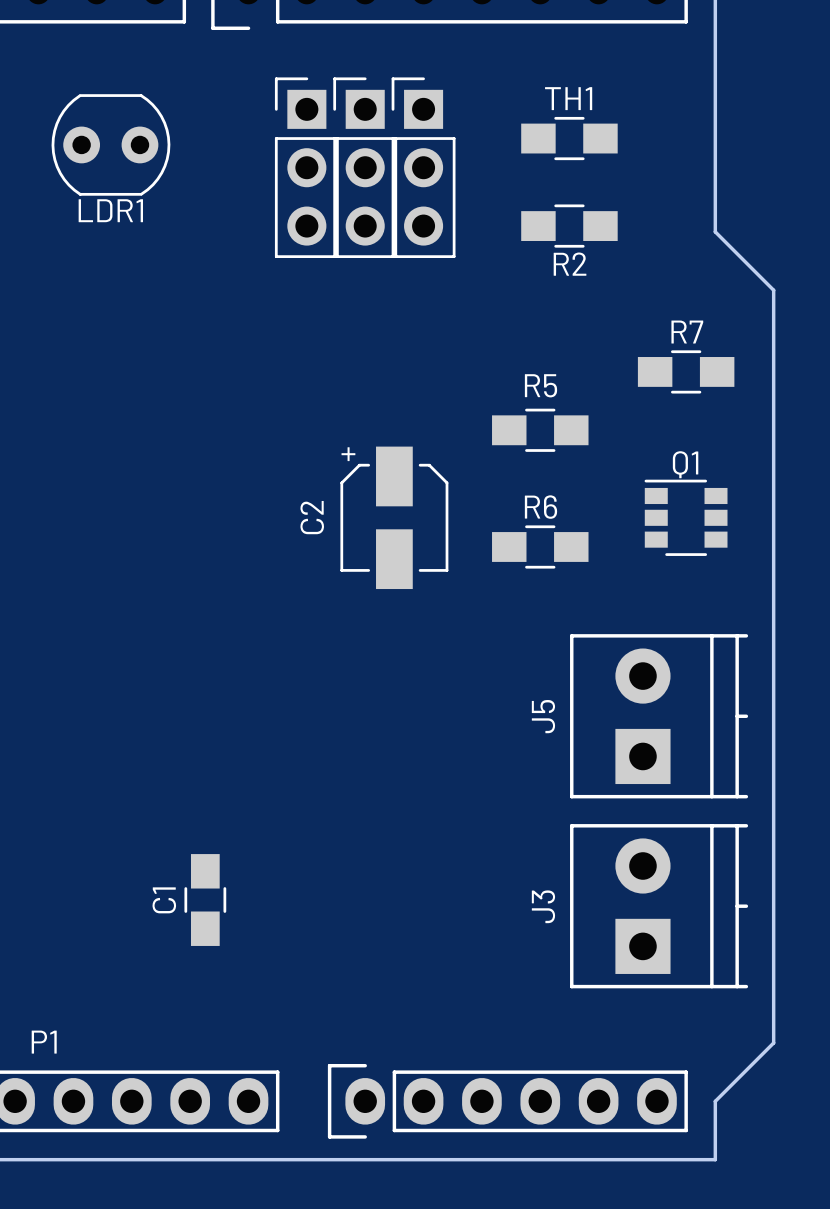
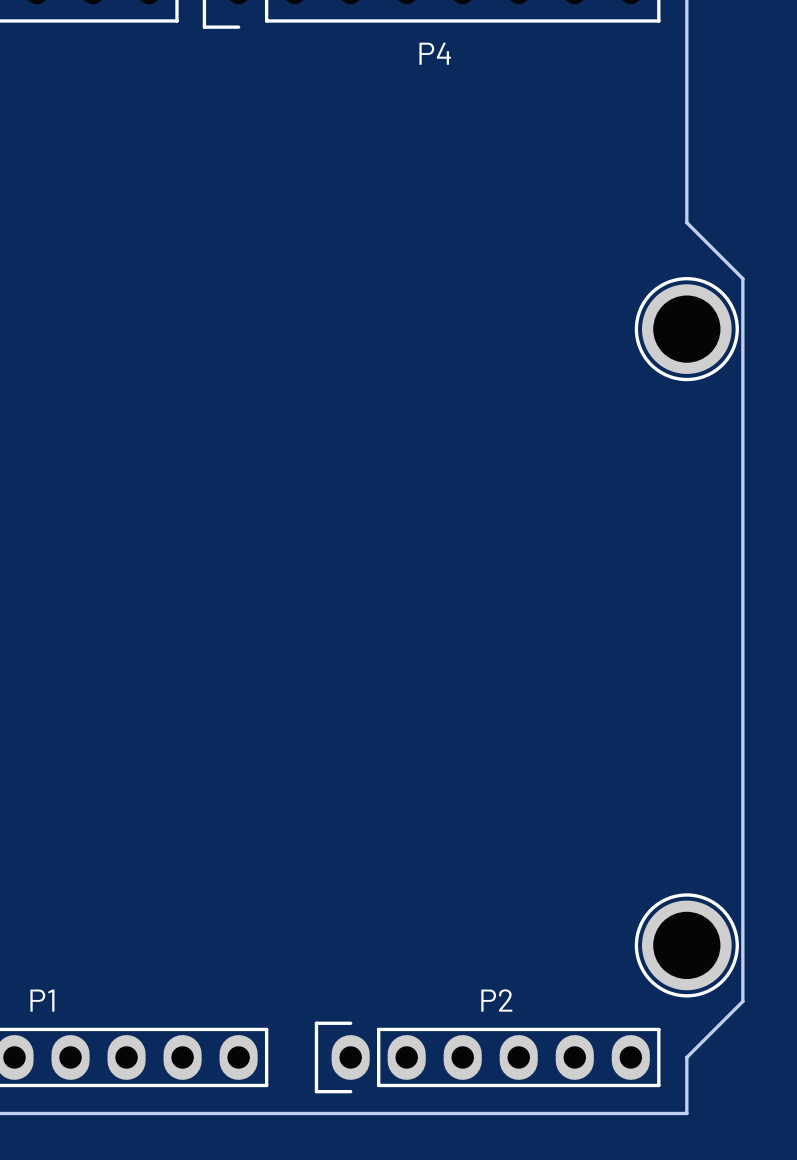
P4 name: none -> P4 (435, 53)
TH1: (569, 138) -> none
LDR1: (110, 144) -> none
part: (306, 167) -> none
part: (365, 167) -> none
part: (423, 167) -> none
R2: (569, 226) -> none
part: none -> (686, 329)
R7: (686, 371) -> none
R5: (540, 430) -> none
C2: (394, 517) -> none
Q1: (686, 517) -> none
R6: (540, 546) -> none
J5: (659, 716) -> none
C1: (205, 900) -> none
J3: (659, 906) -> none
part: none -> (686, 945)
P2 name: none -> P2 (496, 1000)

